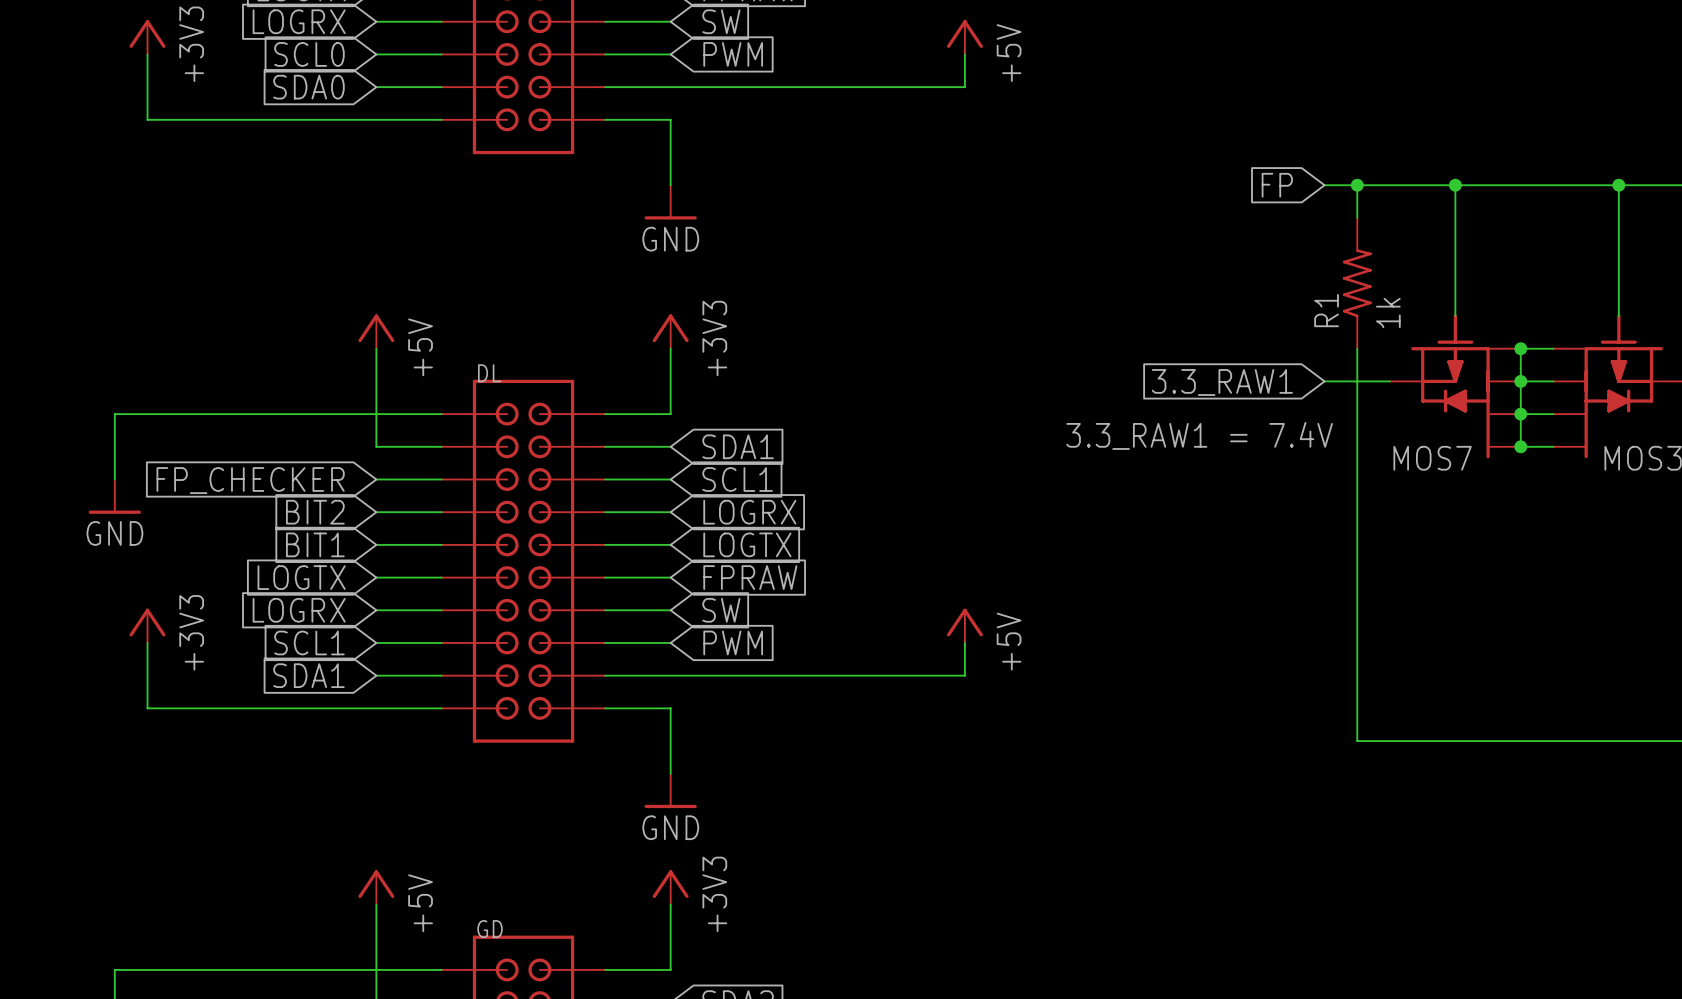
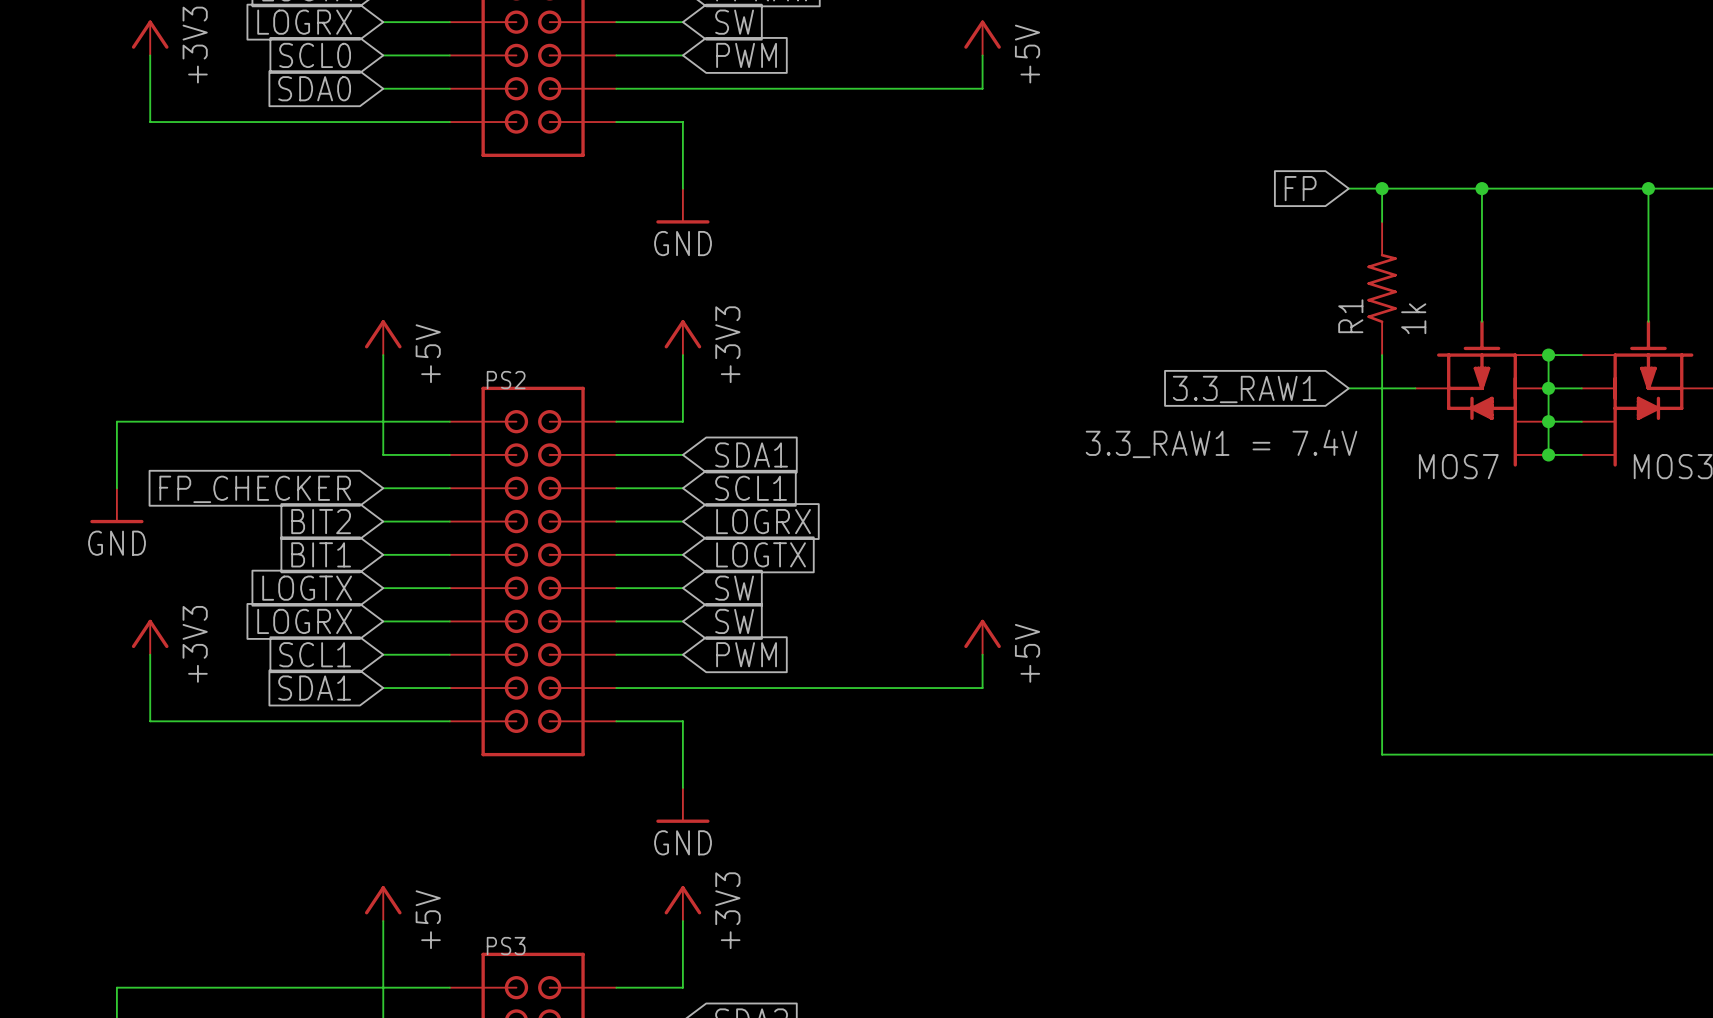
DL name: DL (489, 373) -> PS2 (506, 380)
global label: FPRAW (750, 577) -> SW (734, 588)
GD name: GD (490, 929) -> PS3 (506, 946)

